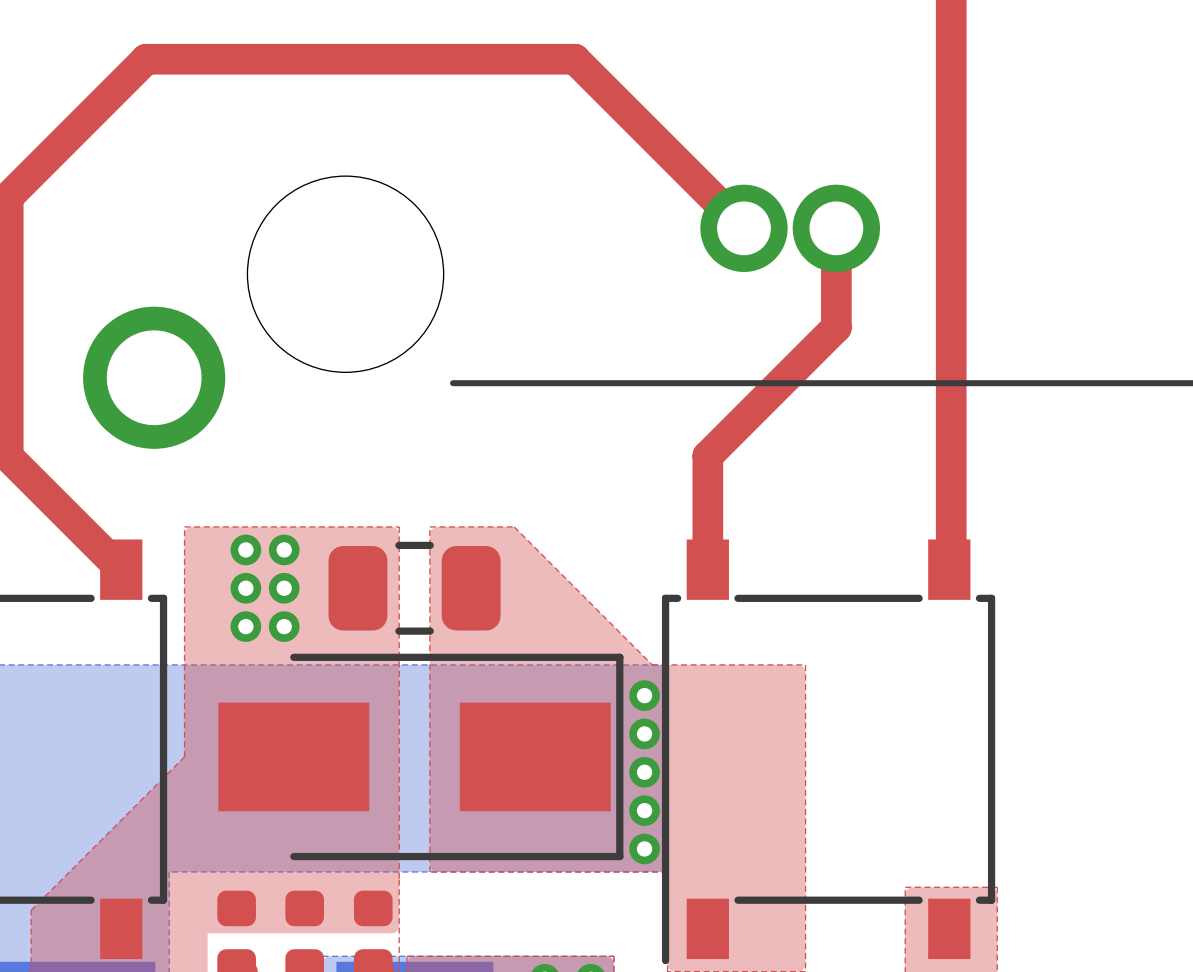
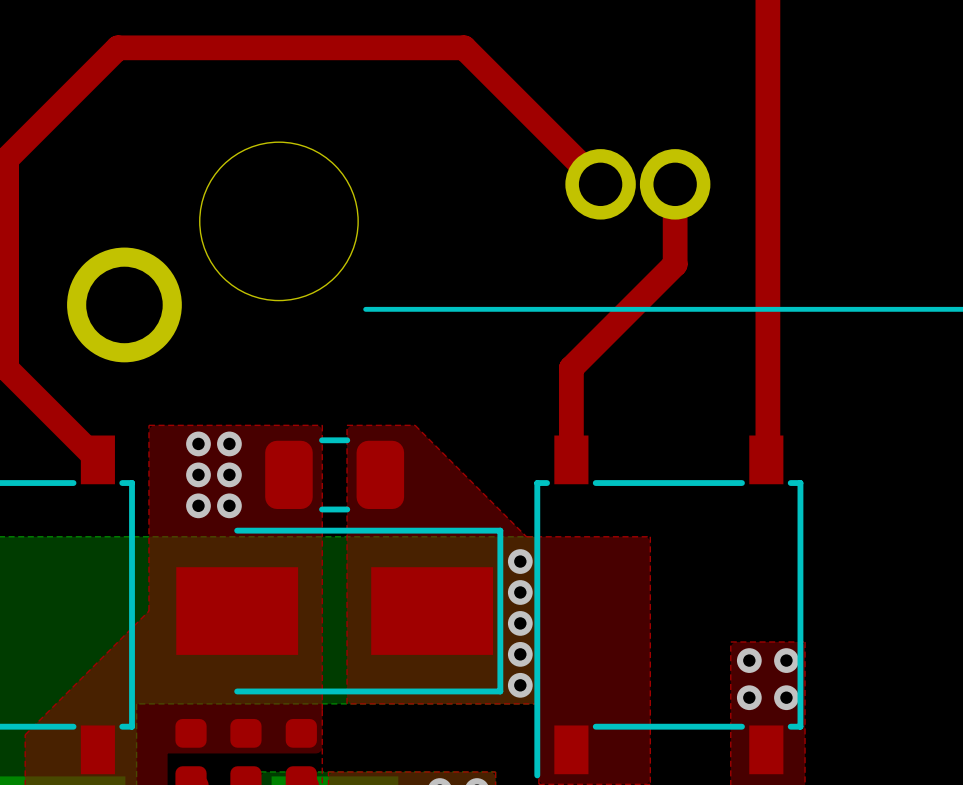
via: none -> (749, 660)
via: none -> (786, 660)
via: none -> (749, 697)
via: none -> (786, 697)
top zone outline: (905, 887) (997, 887) -> (730, 716) (730, 642) (805, 642) (805, 716)

